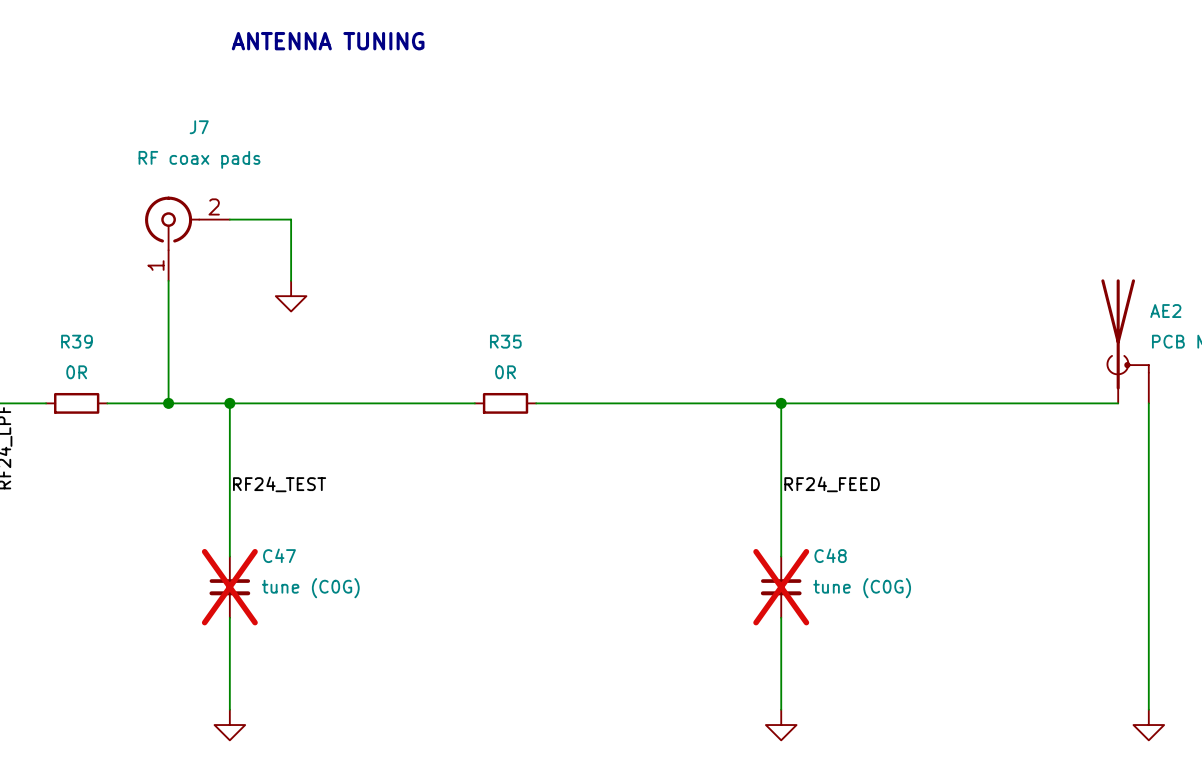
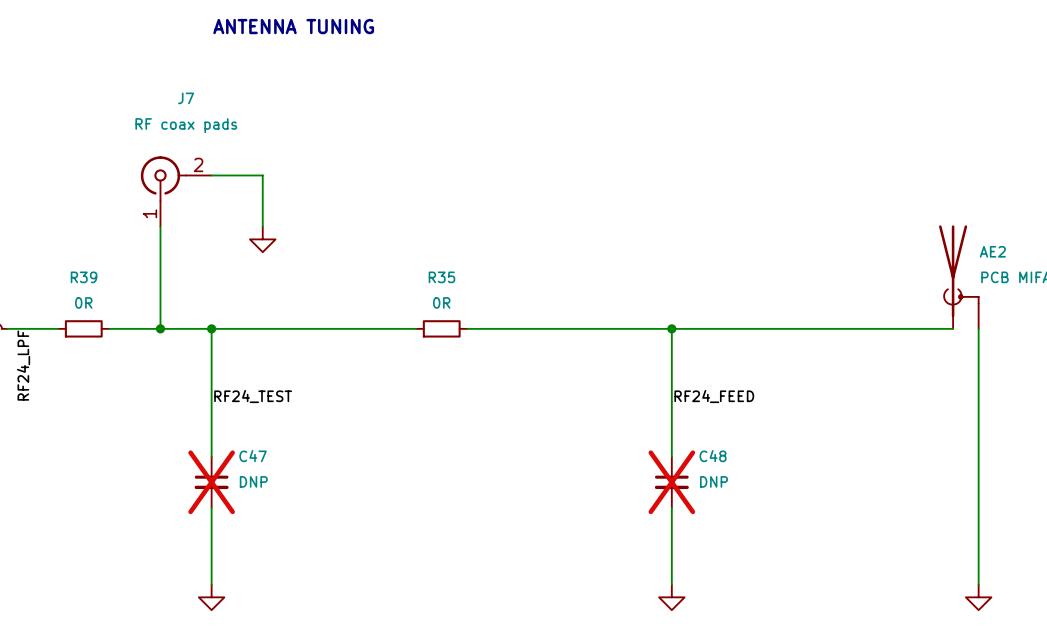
C47 value: tune (C0G) (310, 588) -> DNP (253, 481)
C48 value: tune (C0G) (862, 588) -> DNP (713, 481)

